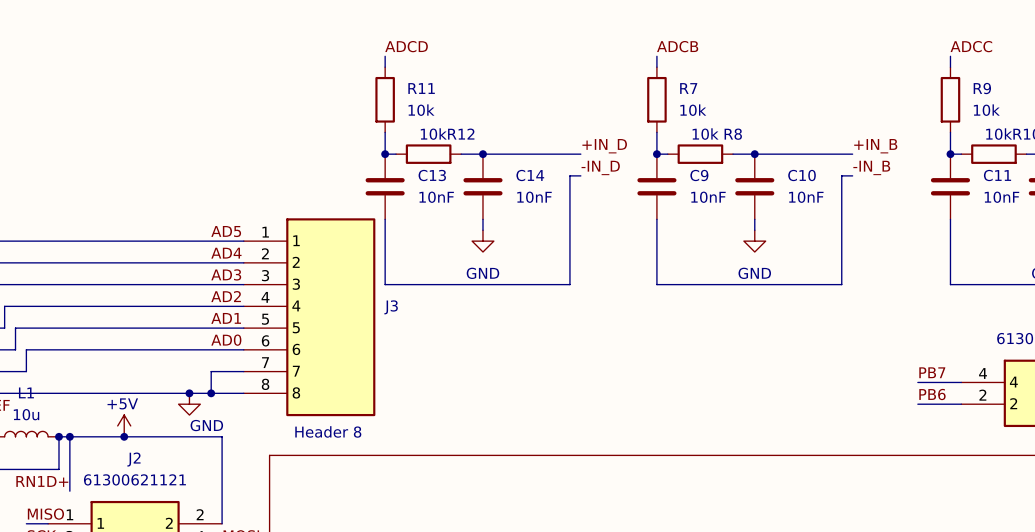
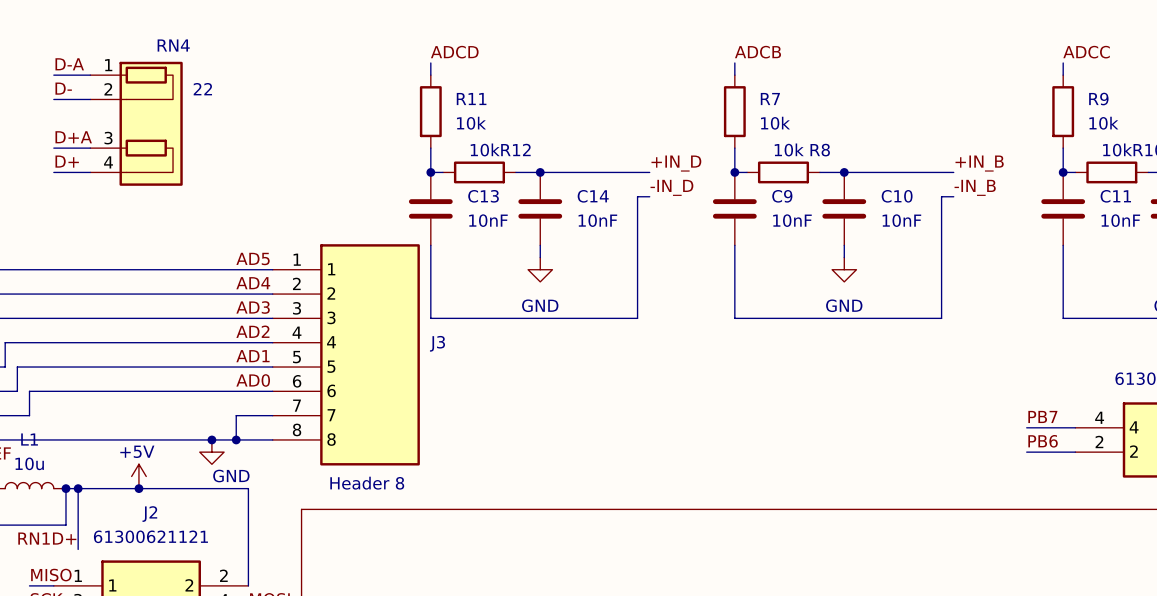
label: none -> D-A (69, 64)
wire: none -> (53, 75) (90, 75)
label: none -> D- (63, 88)
wire: none -> (53, 99) (90, 99)
RN4: none -> 22 (136, 123)
label: none -> D+A (73, 137)
wire: none -> (53, 148) (90, 148)
label: none -> D+ (67, 161)
wire: none -> (53, 172) (90, 172)

